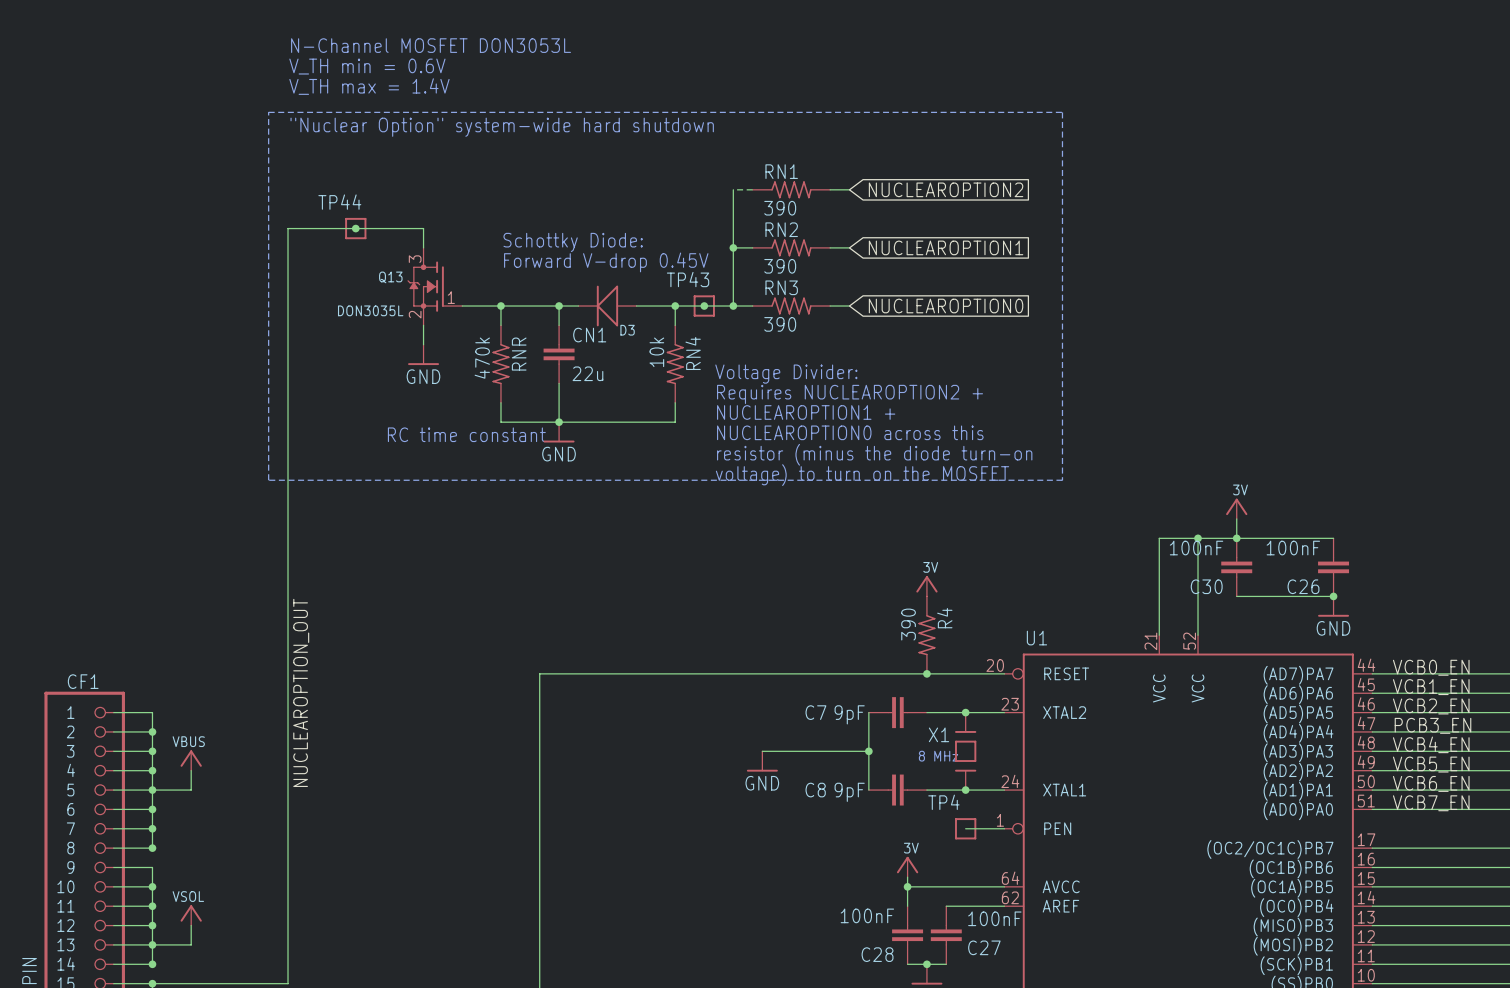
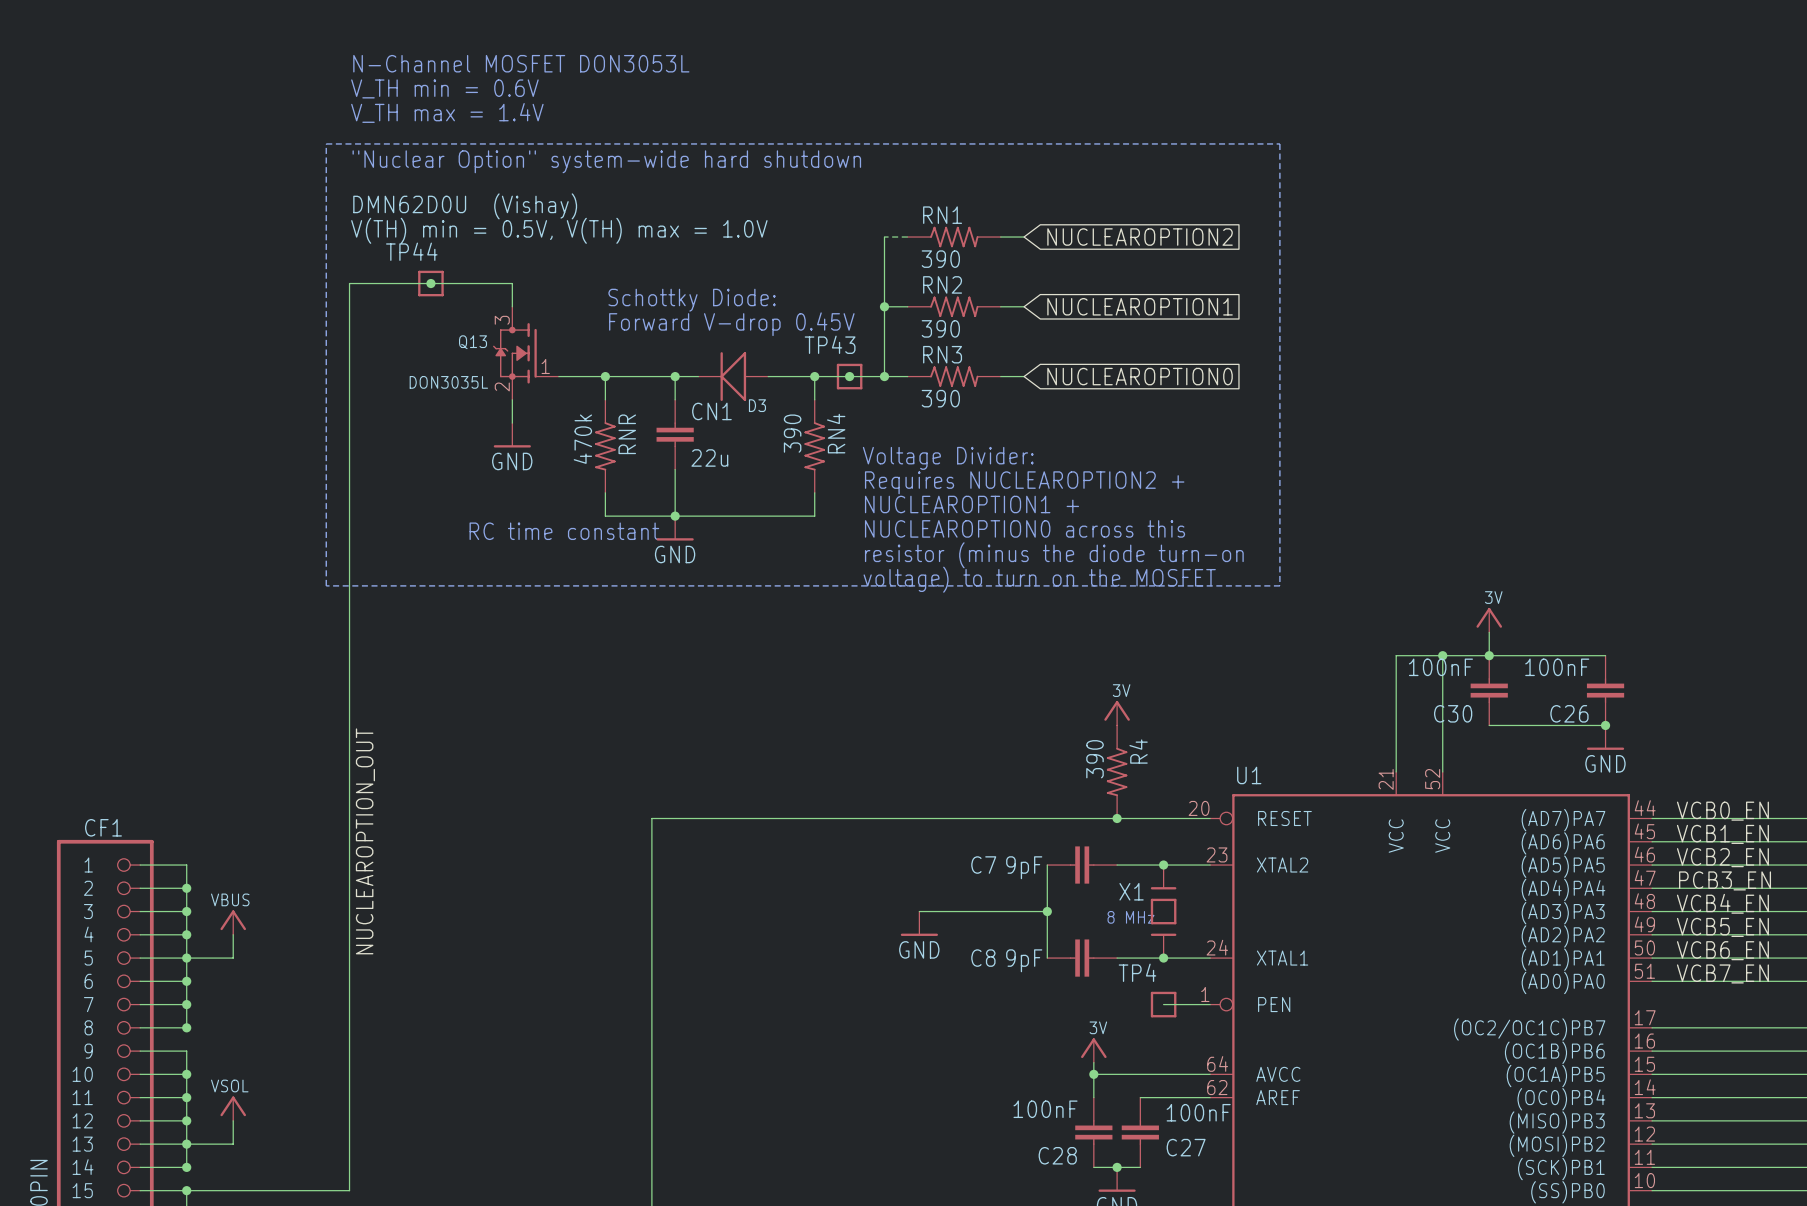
text: none -> DMN62D0U (Vishay) (465, 206)
text: none -> V(TH) min = 0.5V, V(TH) max = 1.0V (559, 230)
RN4 value: 10k (656, 352) -> 390 (792, 433)

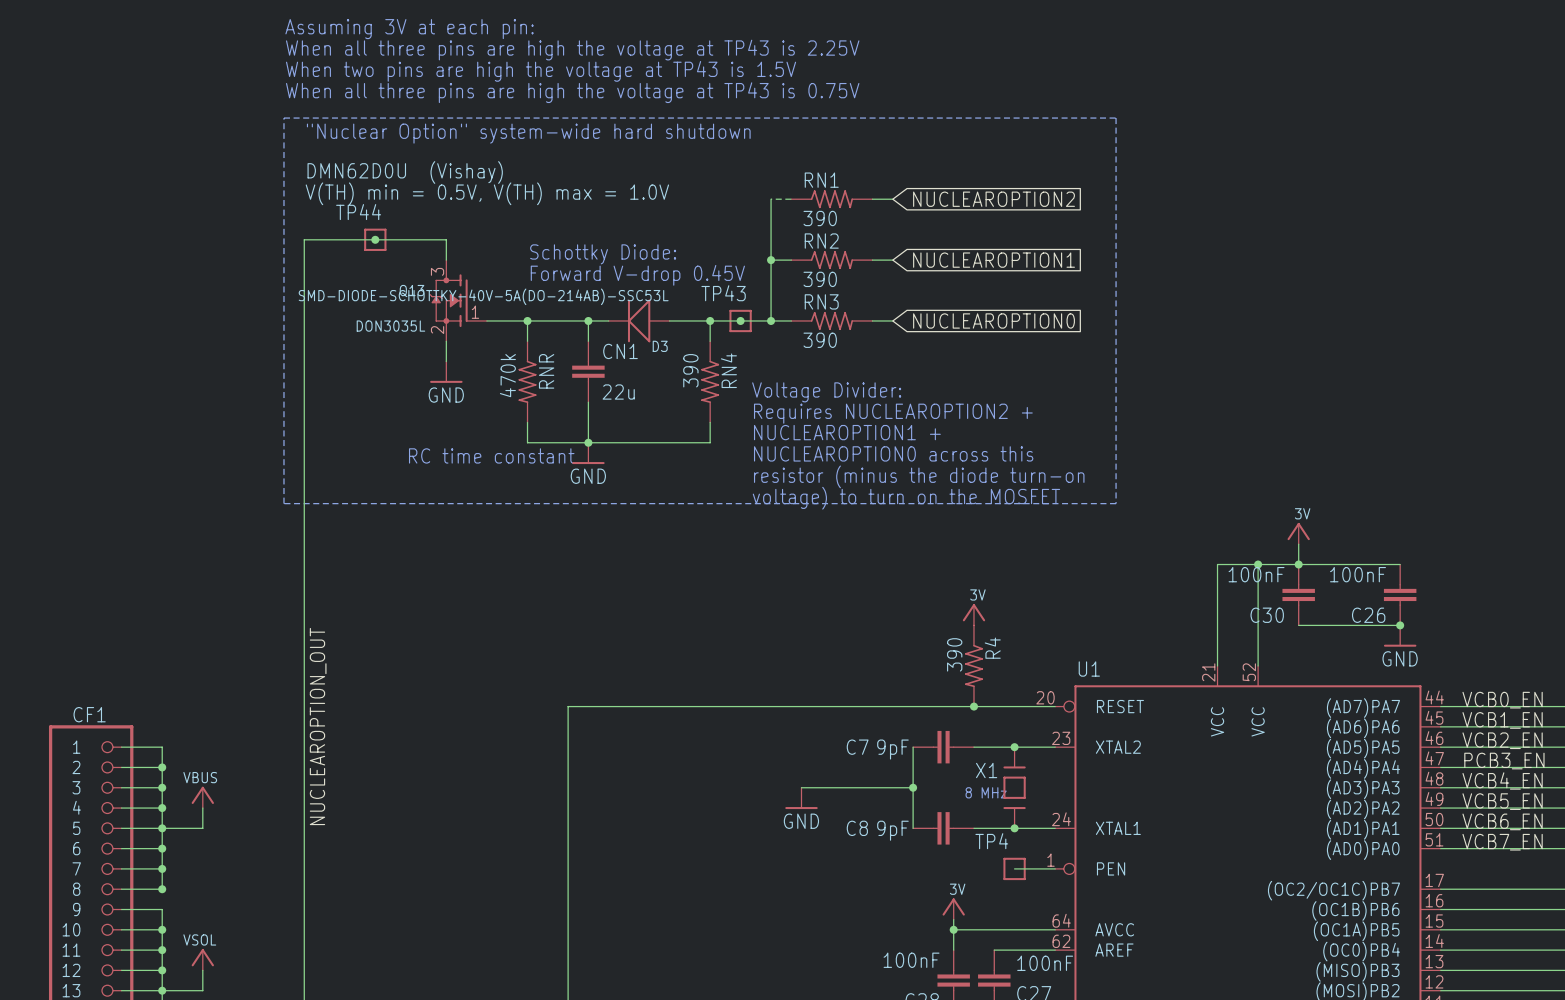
text: none -> Assuming 3V at each pin: (409, 29)
text: N-Channel MOSFET DON3053L (521, 63) -> none
text: none -> When all three pins are high the voltage at TP43 is 2.25V (572, 50)
text: V_TH min = 0.6V (444, 88) -> none
text: none -> When two pins are high the voltage at TP43 is 1.5V (541, 71)
text: V_TH max = 1.4V (447, 112) -> none
text: none -> When all three pins are high the voltage at TP43 is 0.75V (572, 92)
D3 value: none -> SMD-DIODE-SCHOTTKY-40V-5A(DO-214AB)-SSC53L (483, 296)

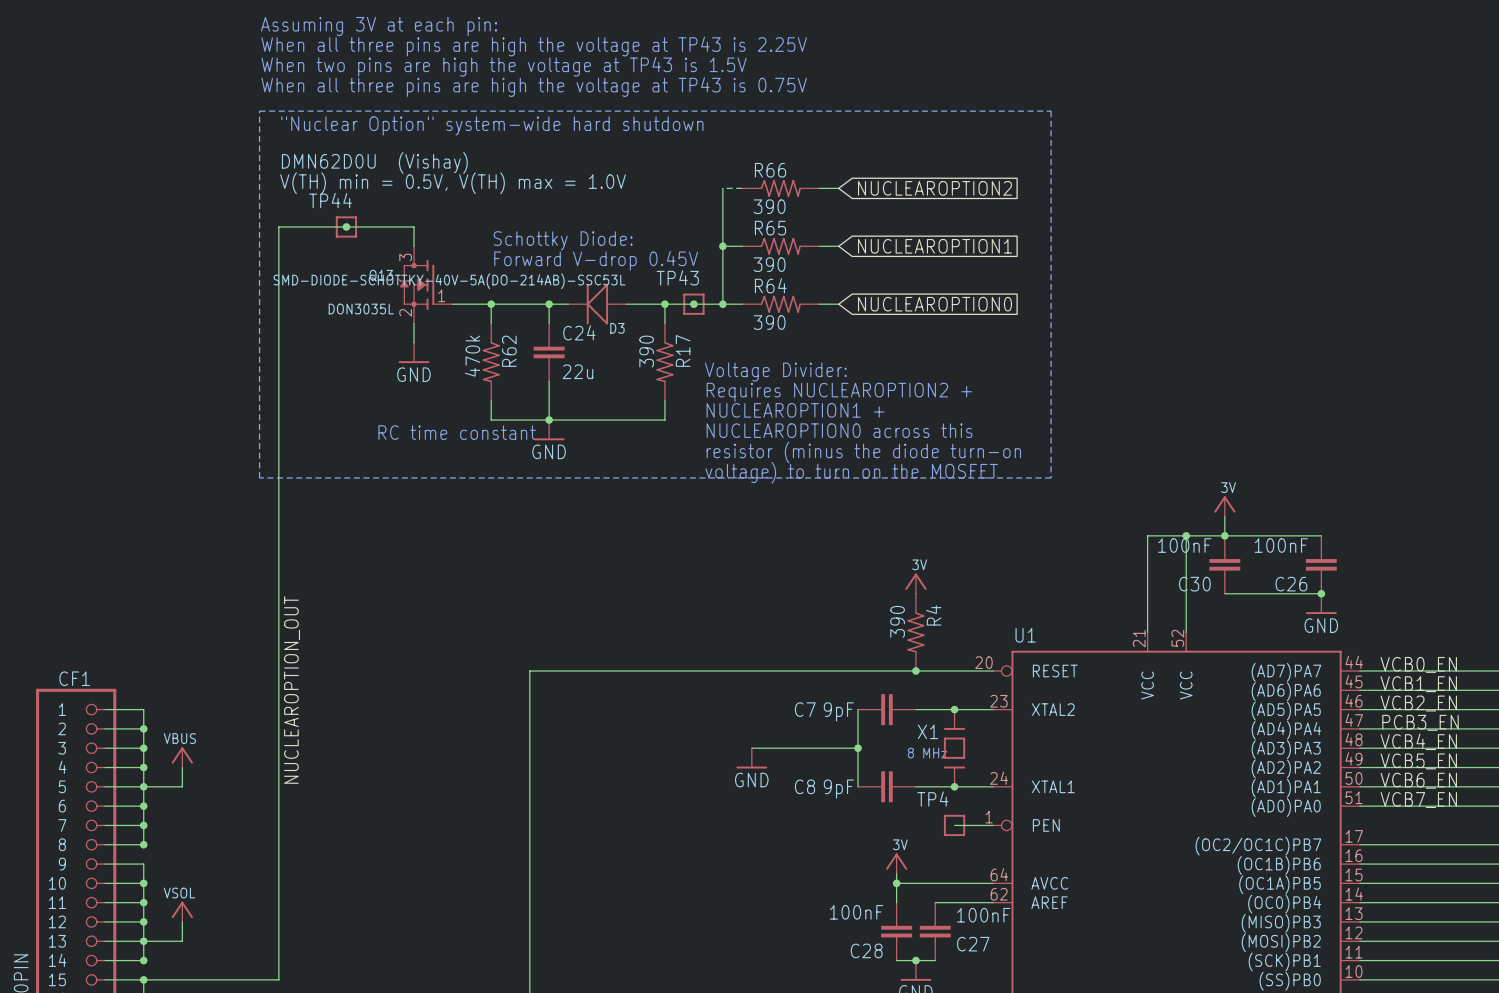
RN1 name: RN1 (821, 180) -> R66 (770, 170)
RN2 name: RN2 (821, 241) -> R65 (770, 228)
RN3 name: RN3 (821, 301) -> R64 (770, 285)
CN1 name: CN1 (620, 351) -> C24 (579, 332)
RN4 name: RN4 (728, 370) -> R17 (683, 350)
RNR name: RNR (546, 371) -> R62 (509, 351)

